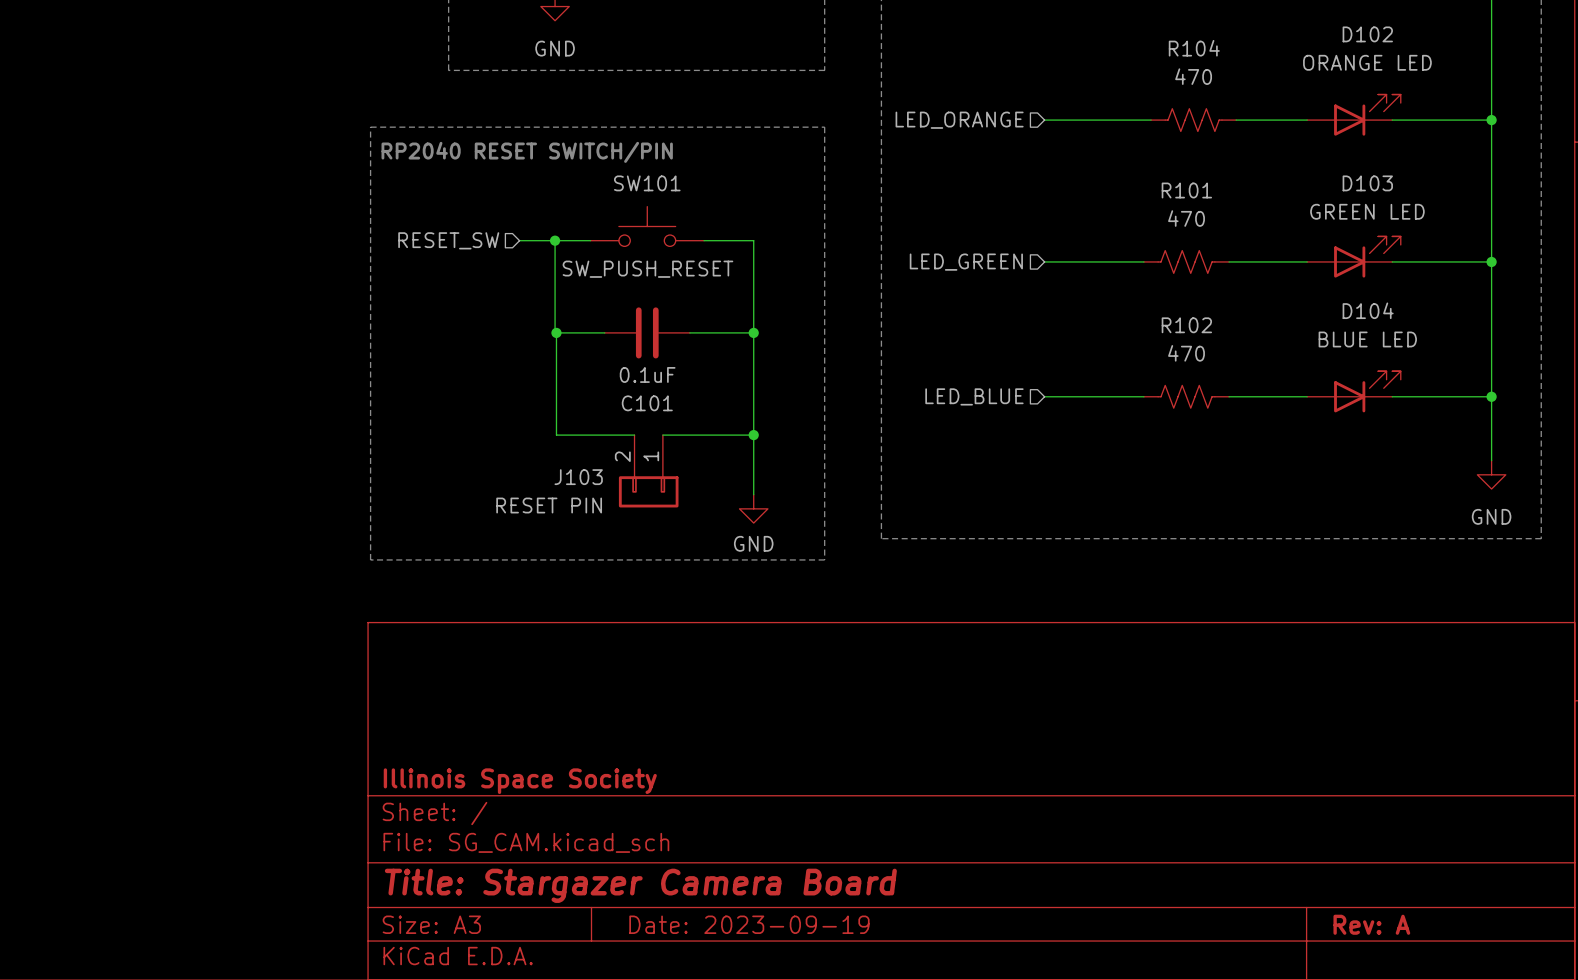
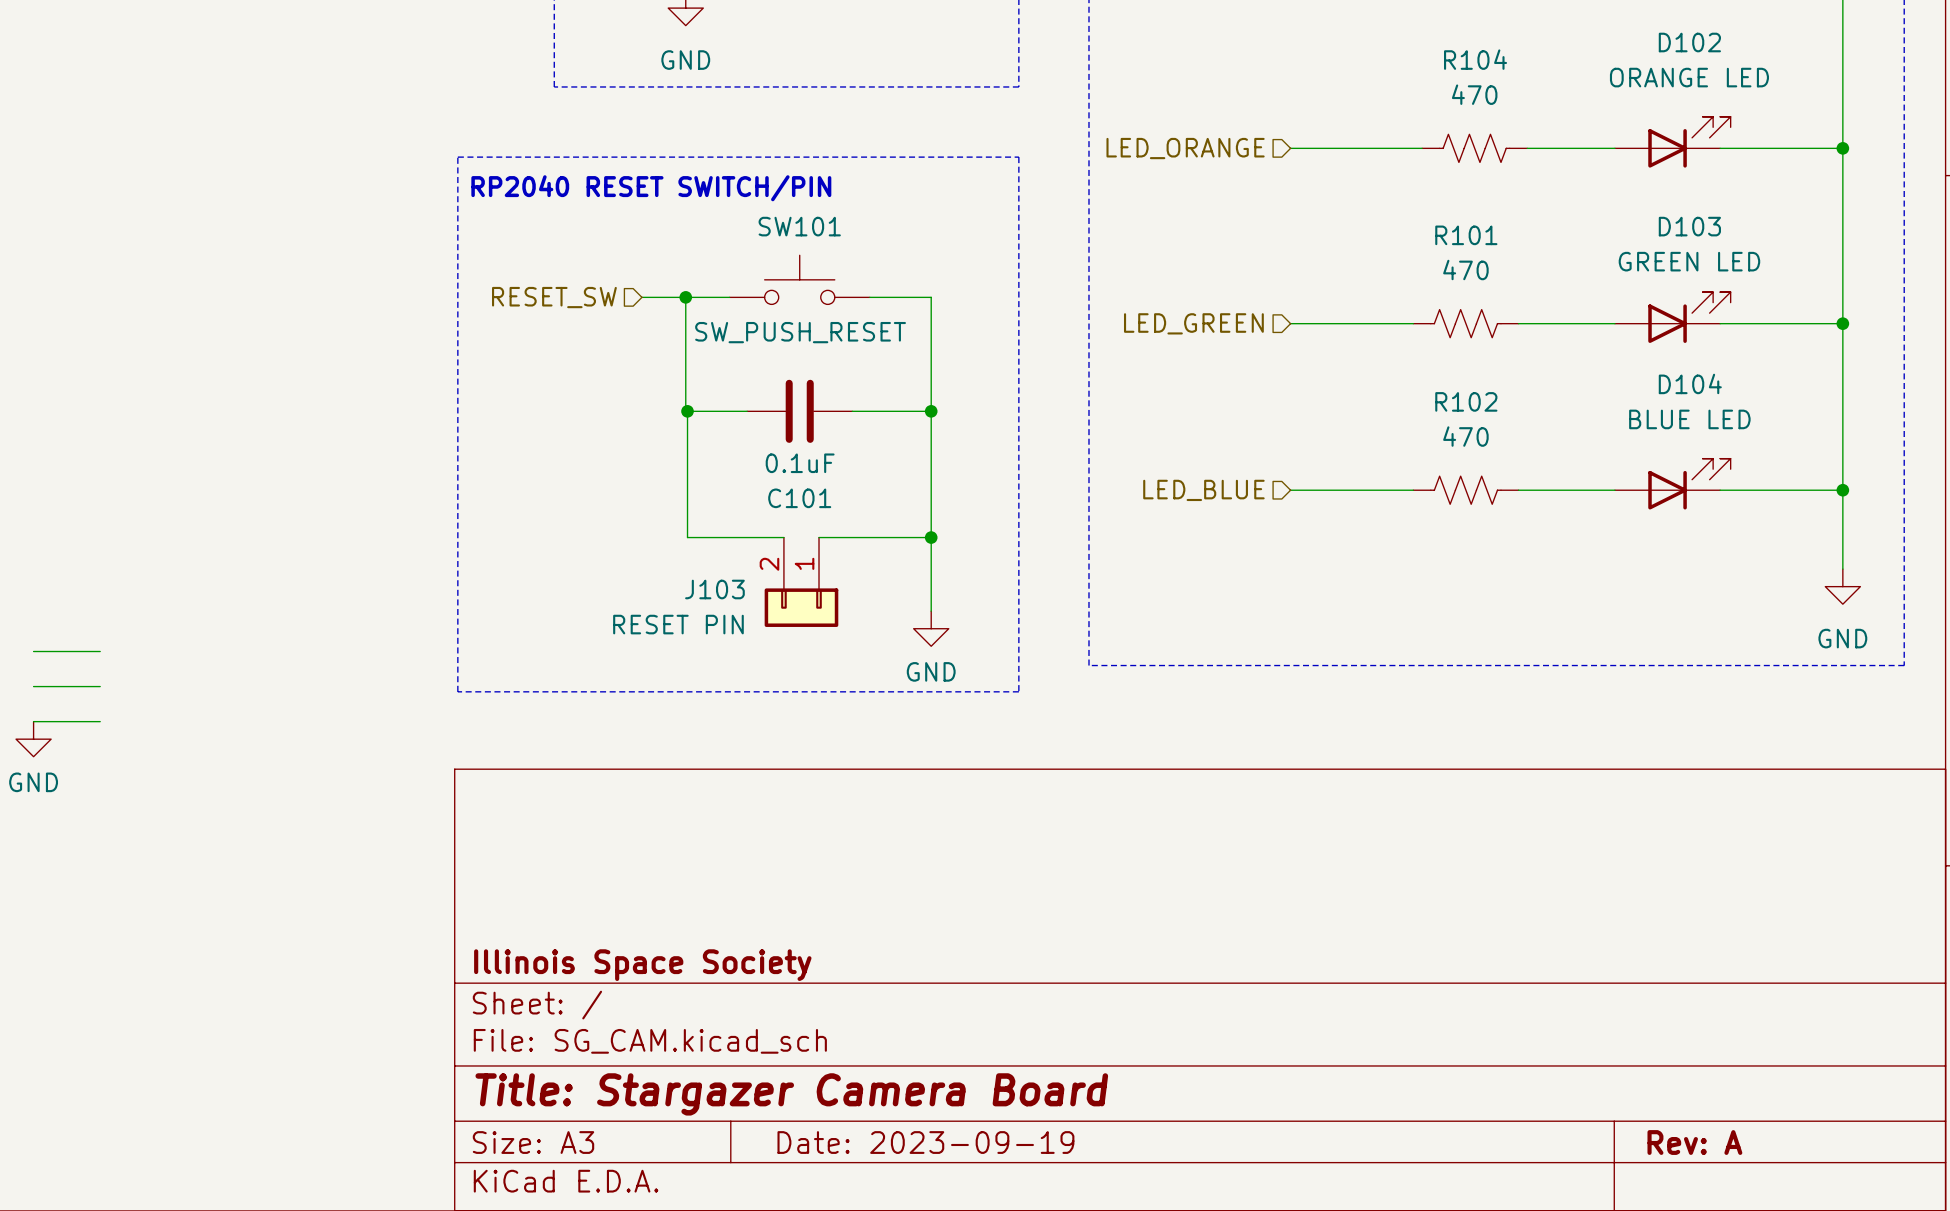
wire: none -> (33, 651) (100, 651)
wire: none -> (33, 686) (100, 686)
wire: none -> (33, 721) (100, 721)
power symbol: none -> GND (33, 739)

